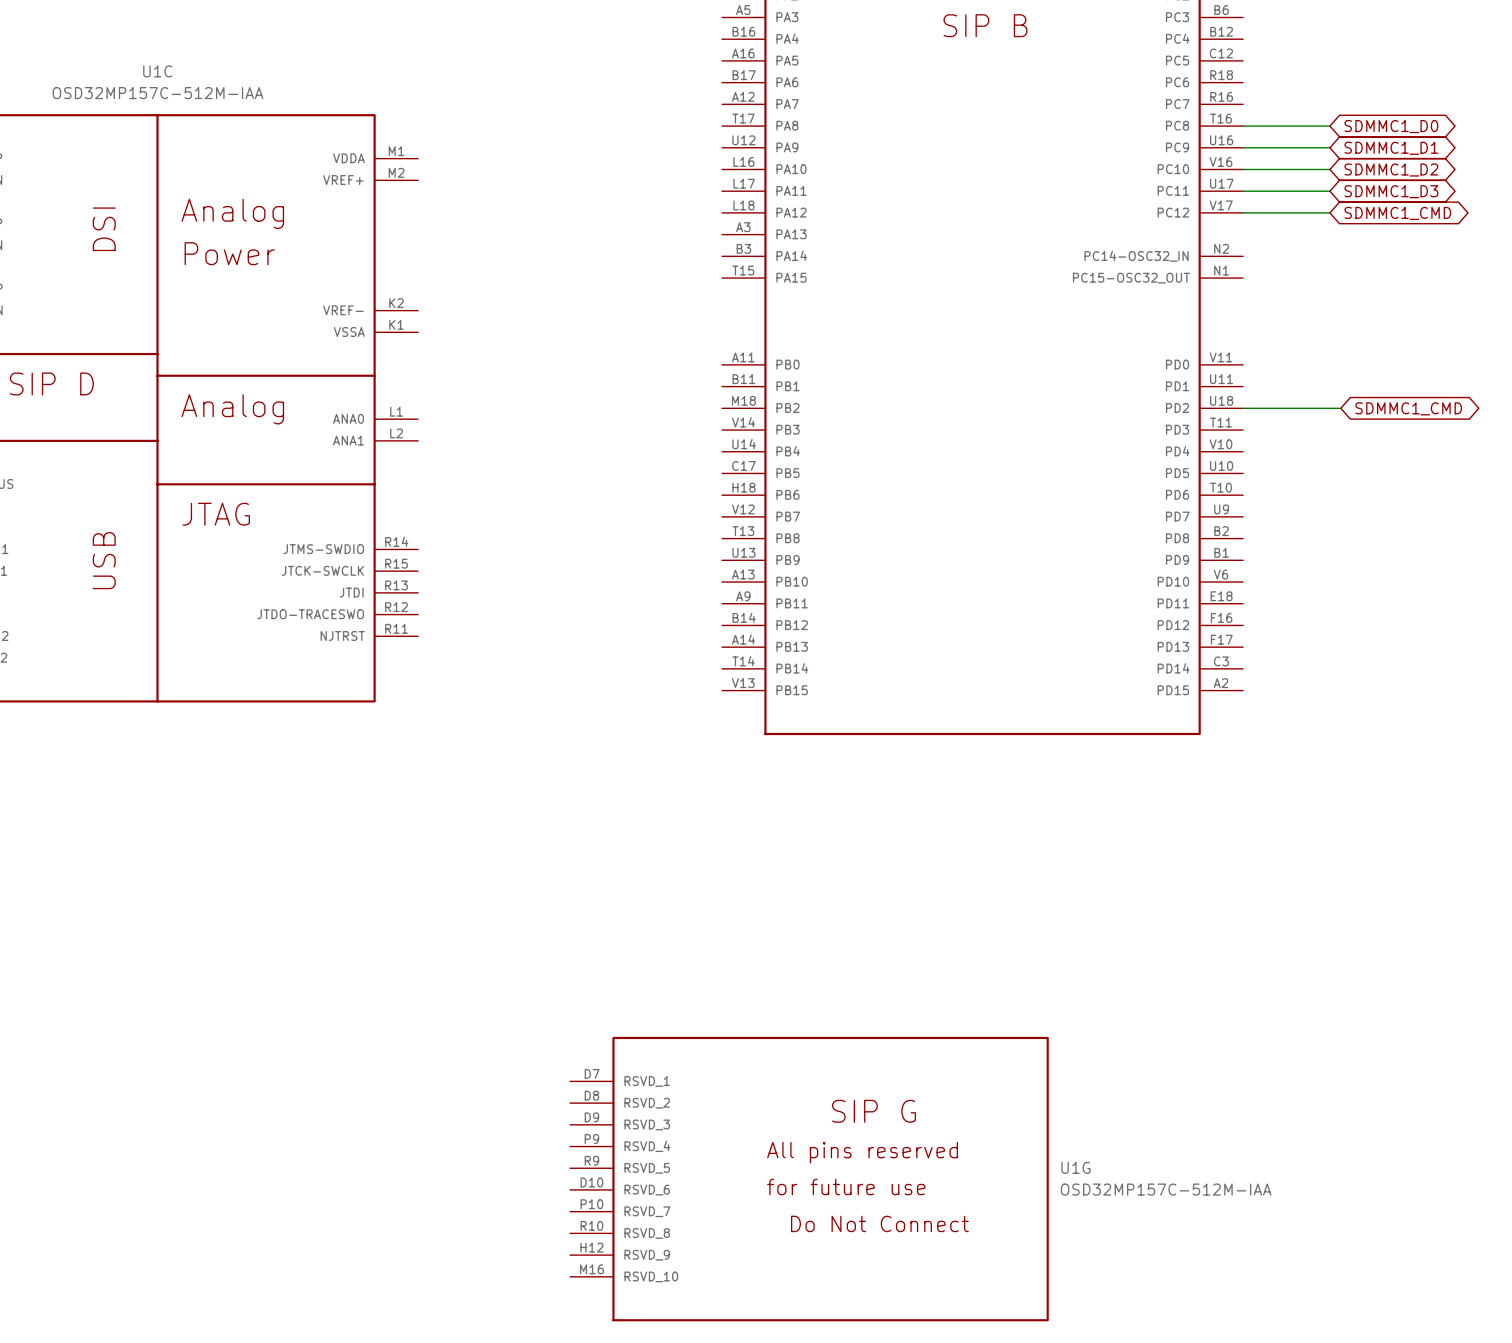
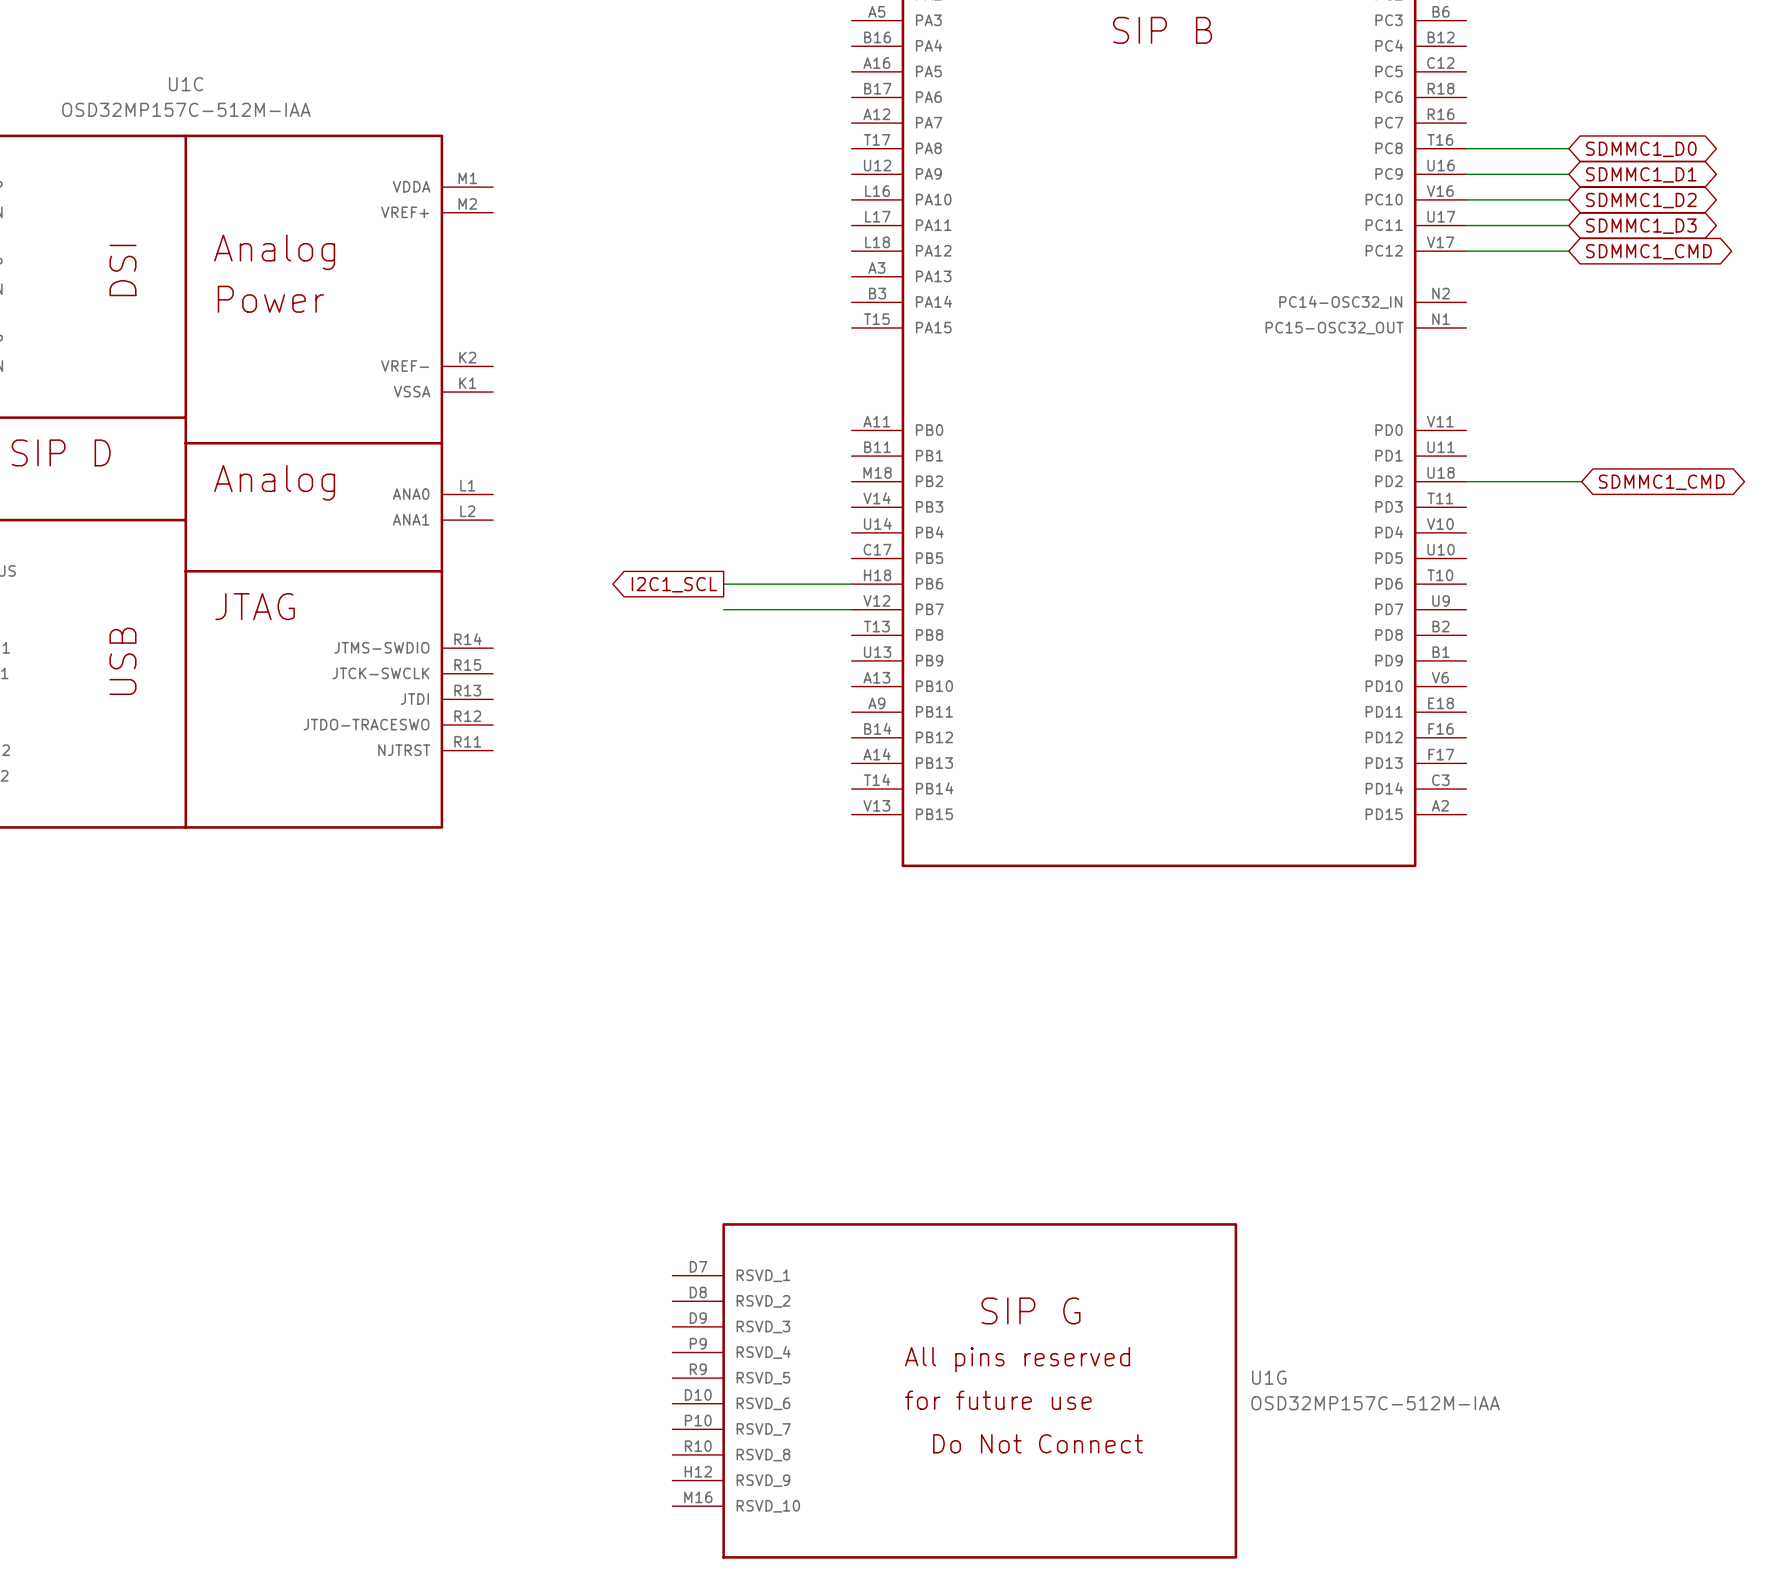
global label: none -> I2C1_SCL (674, 584)
wire: none -> (723, 584) (851, 584)
wire: none -> (723, 609) (851, 609)

